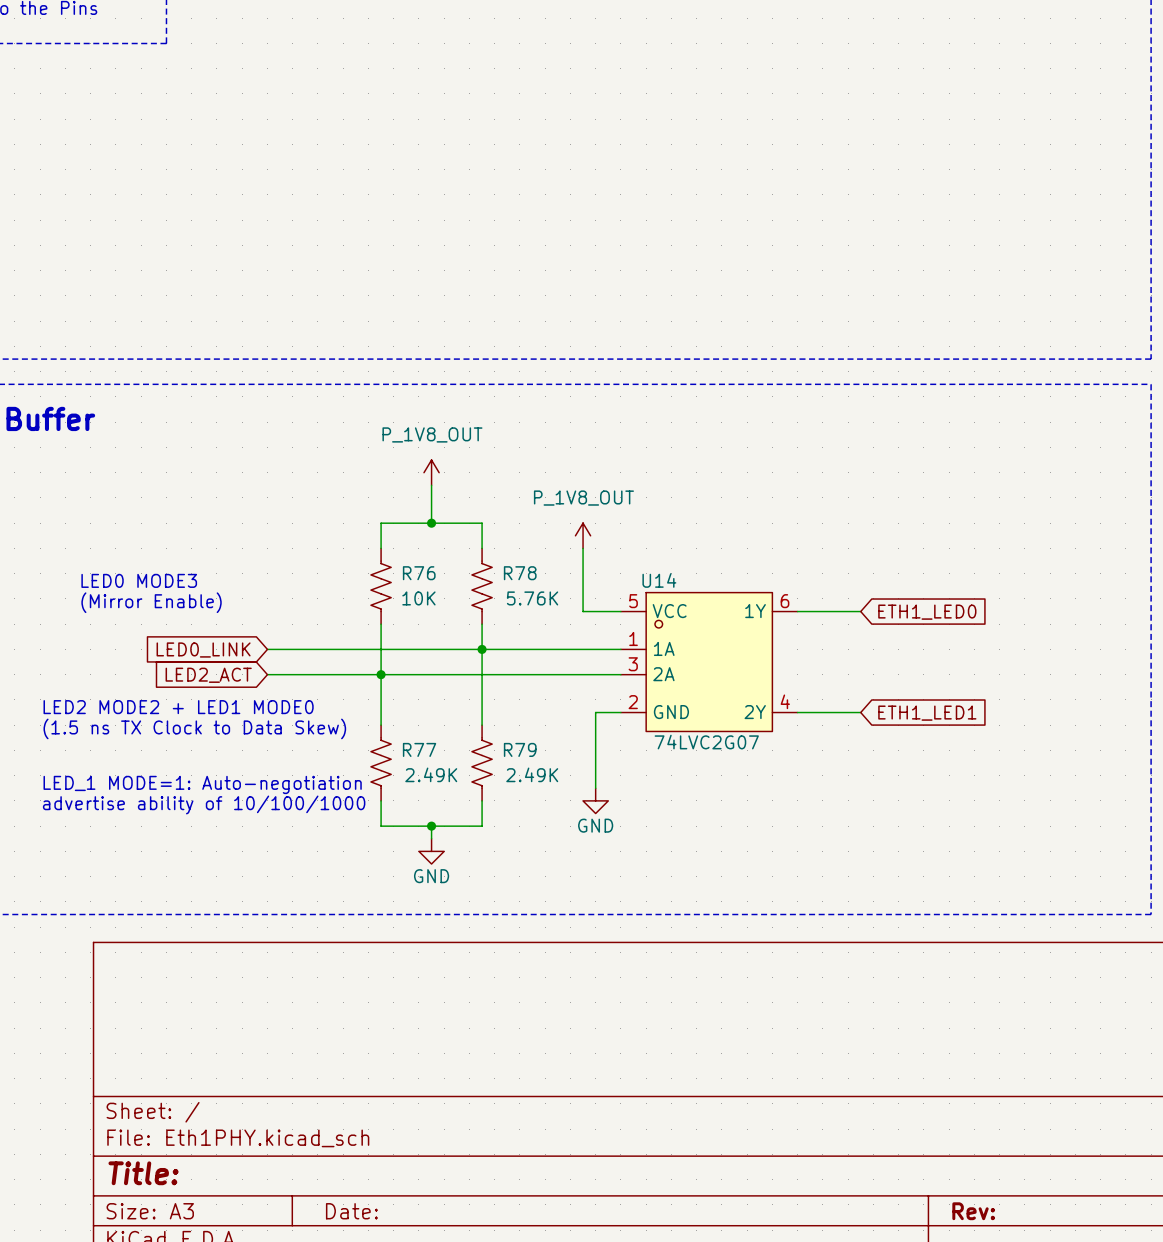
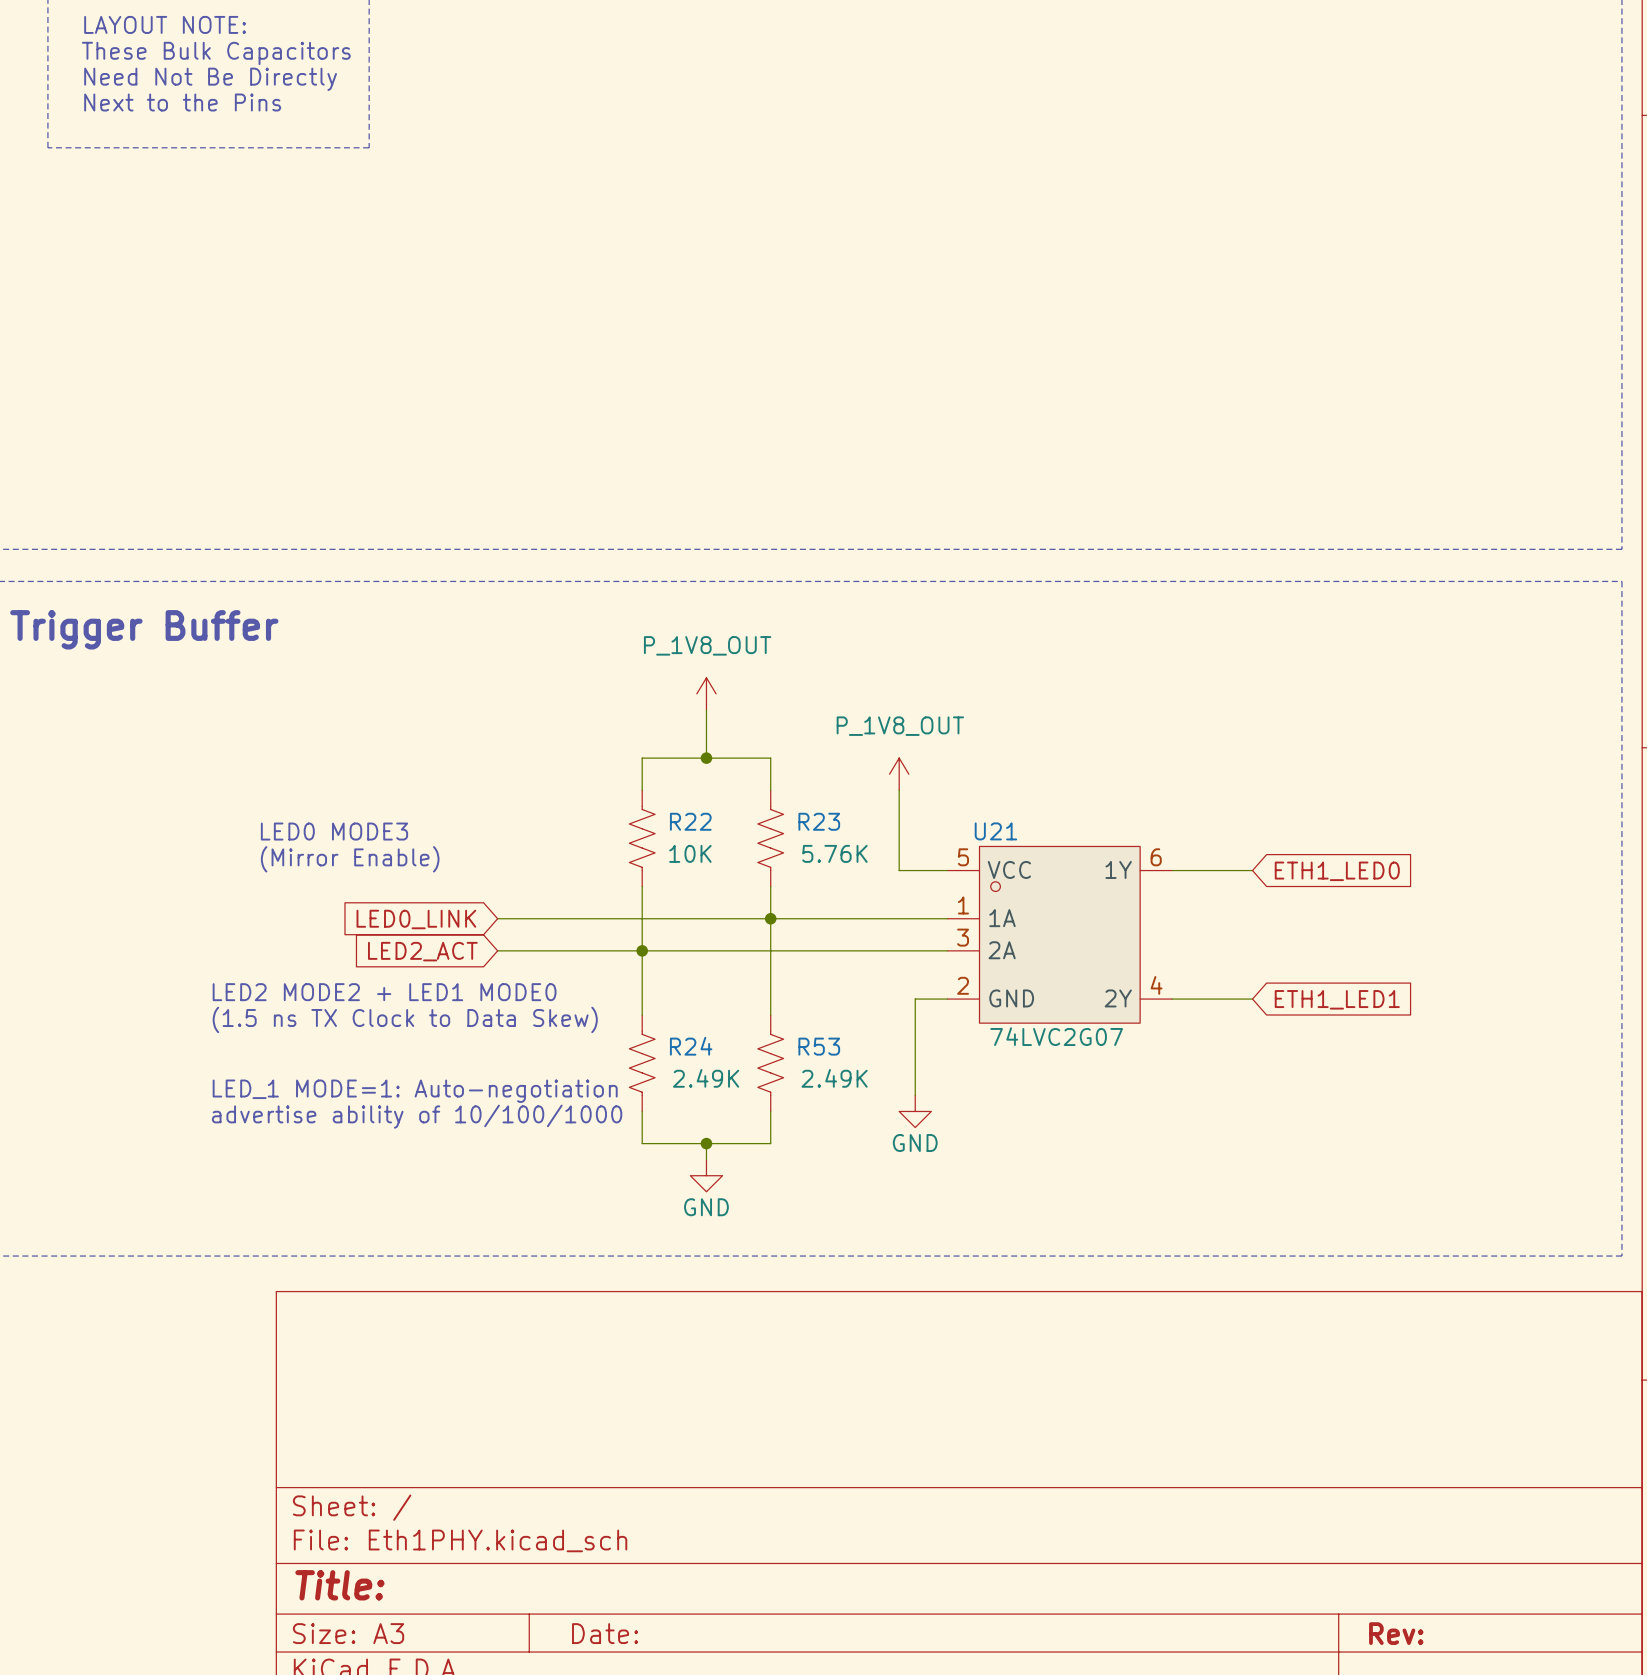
R76 name: R76 (419, 573) -> R22 (690, 821)
R78 name: R78 (520, 573) -> R23 (819, 821)
U14 name: U14 (659, 580) -> U21 (995, 831)
R77 name: R77 (419, 749) -> R24 (691, 1046)
R79 name: R79 (520, 749) -> R53 (819, 1046)

